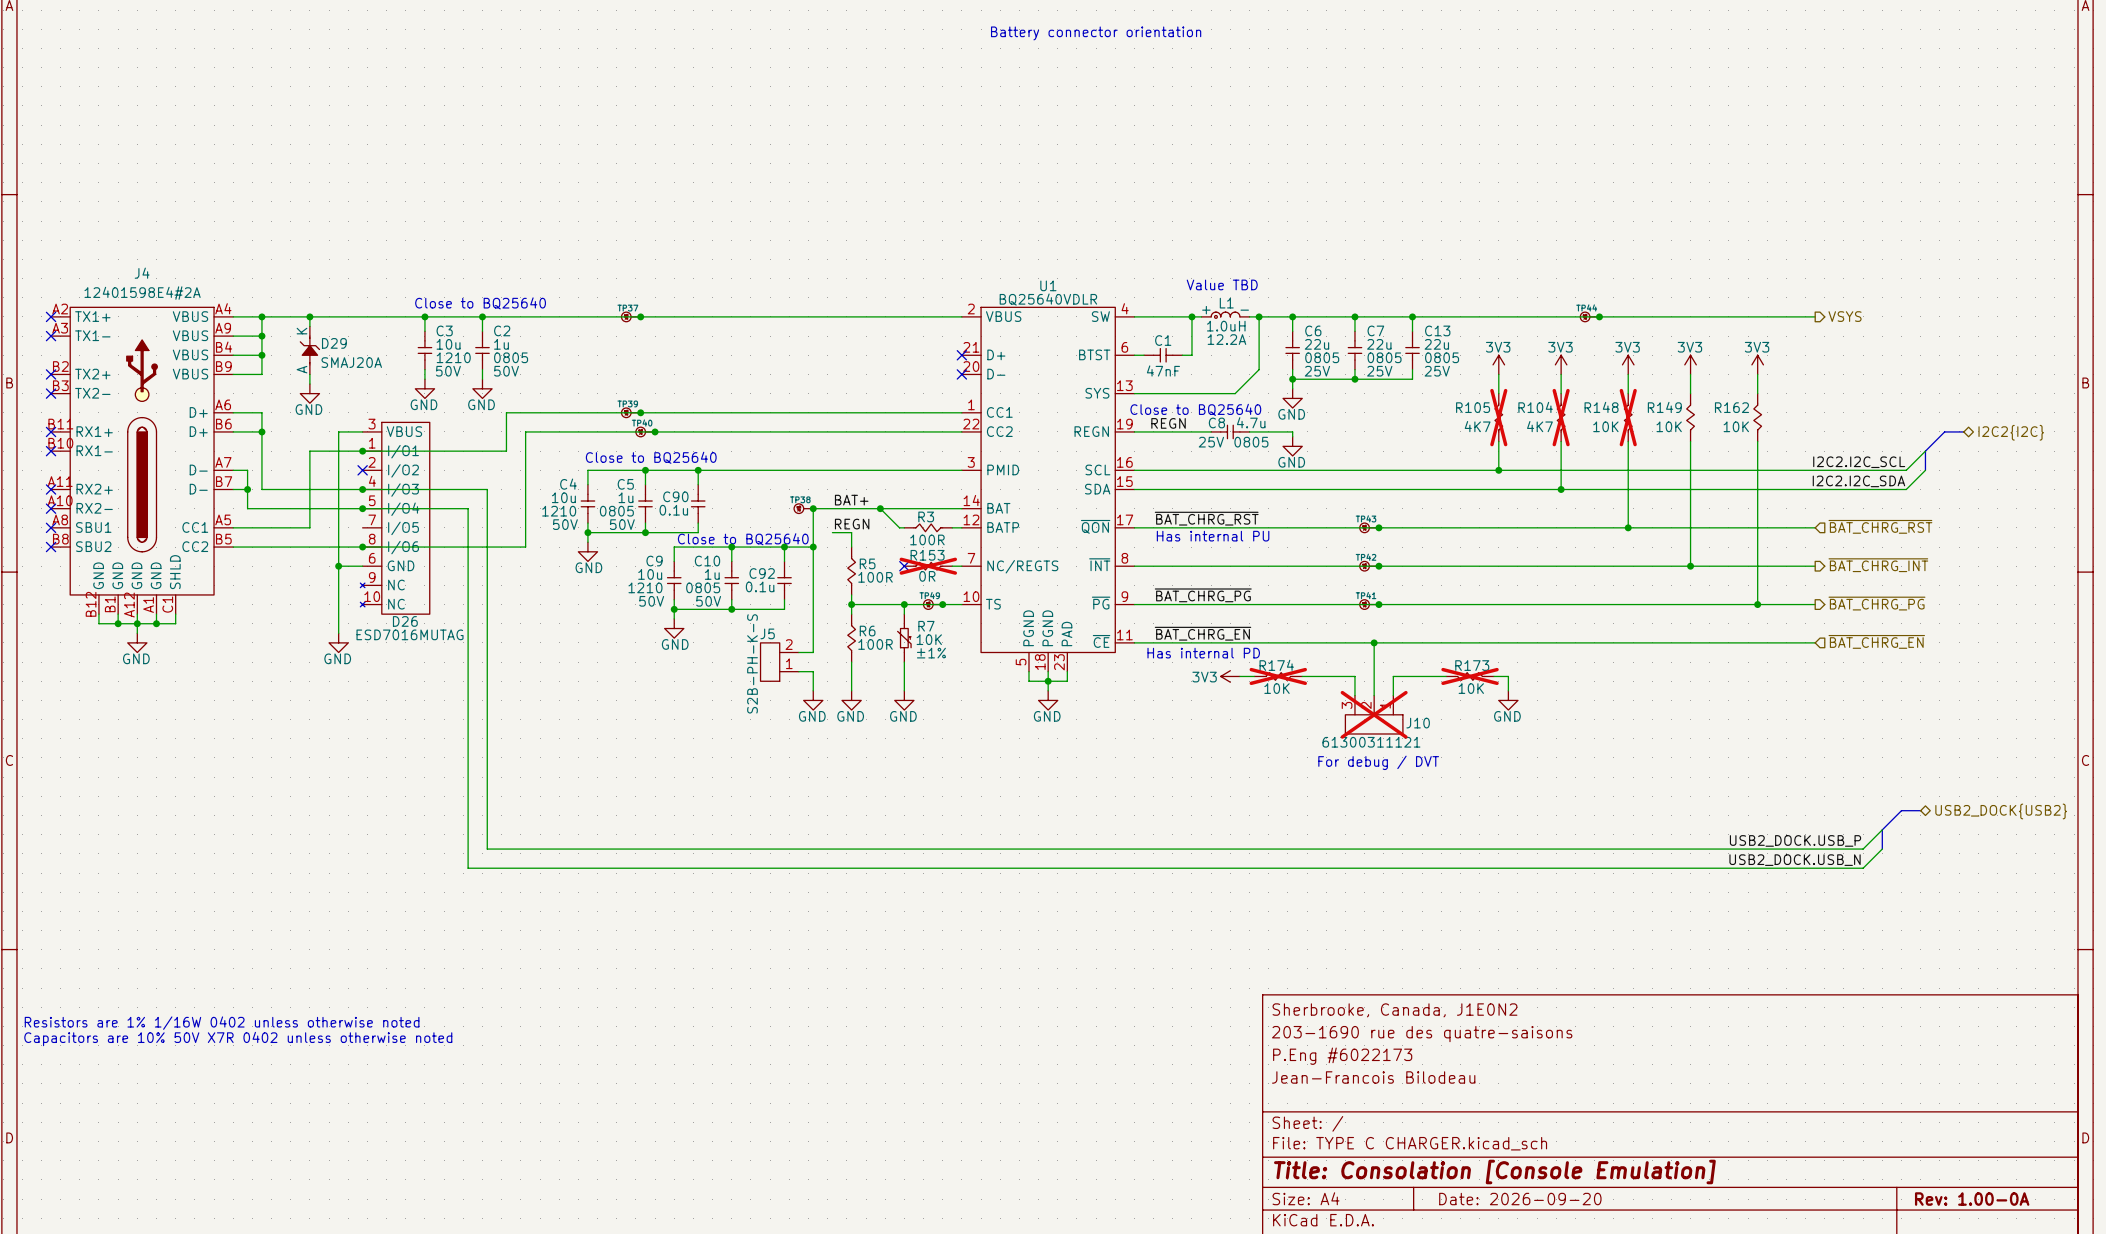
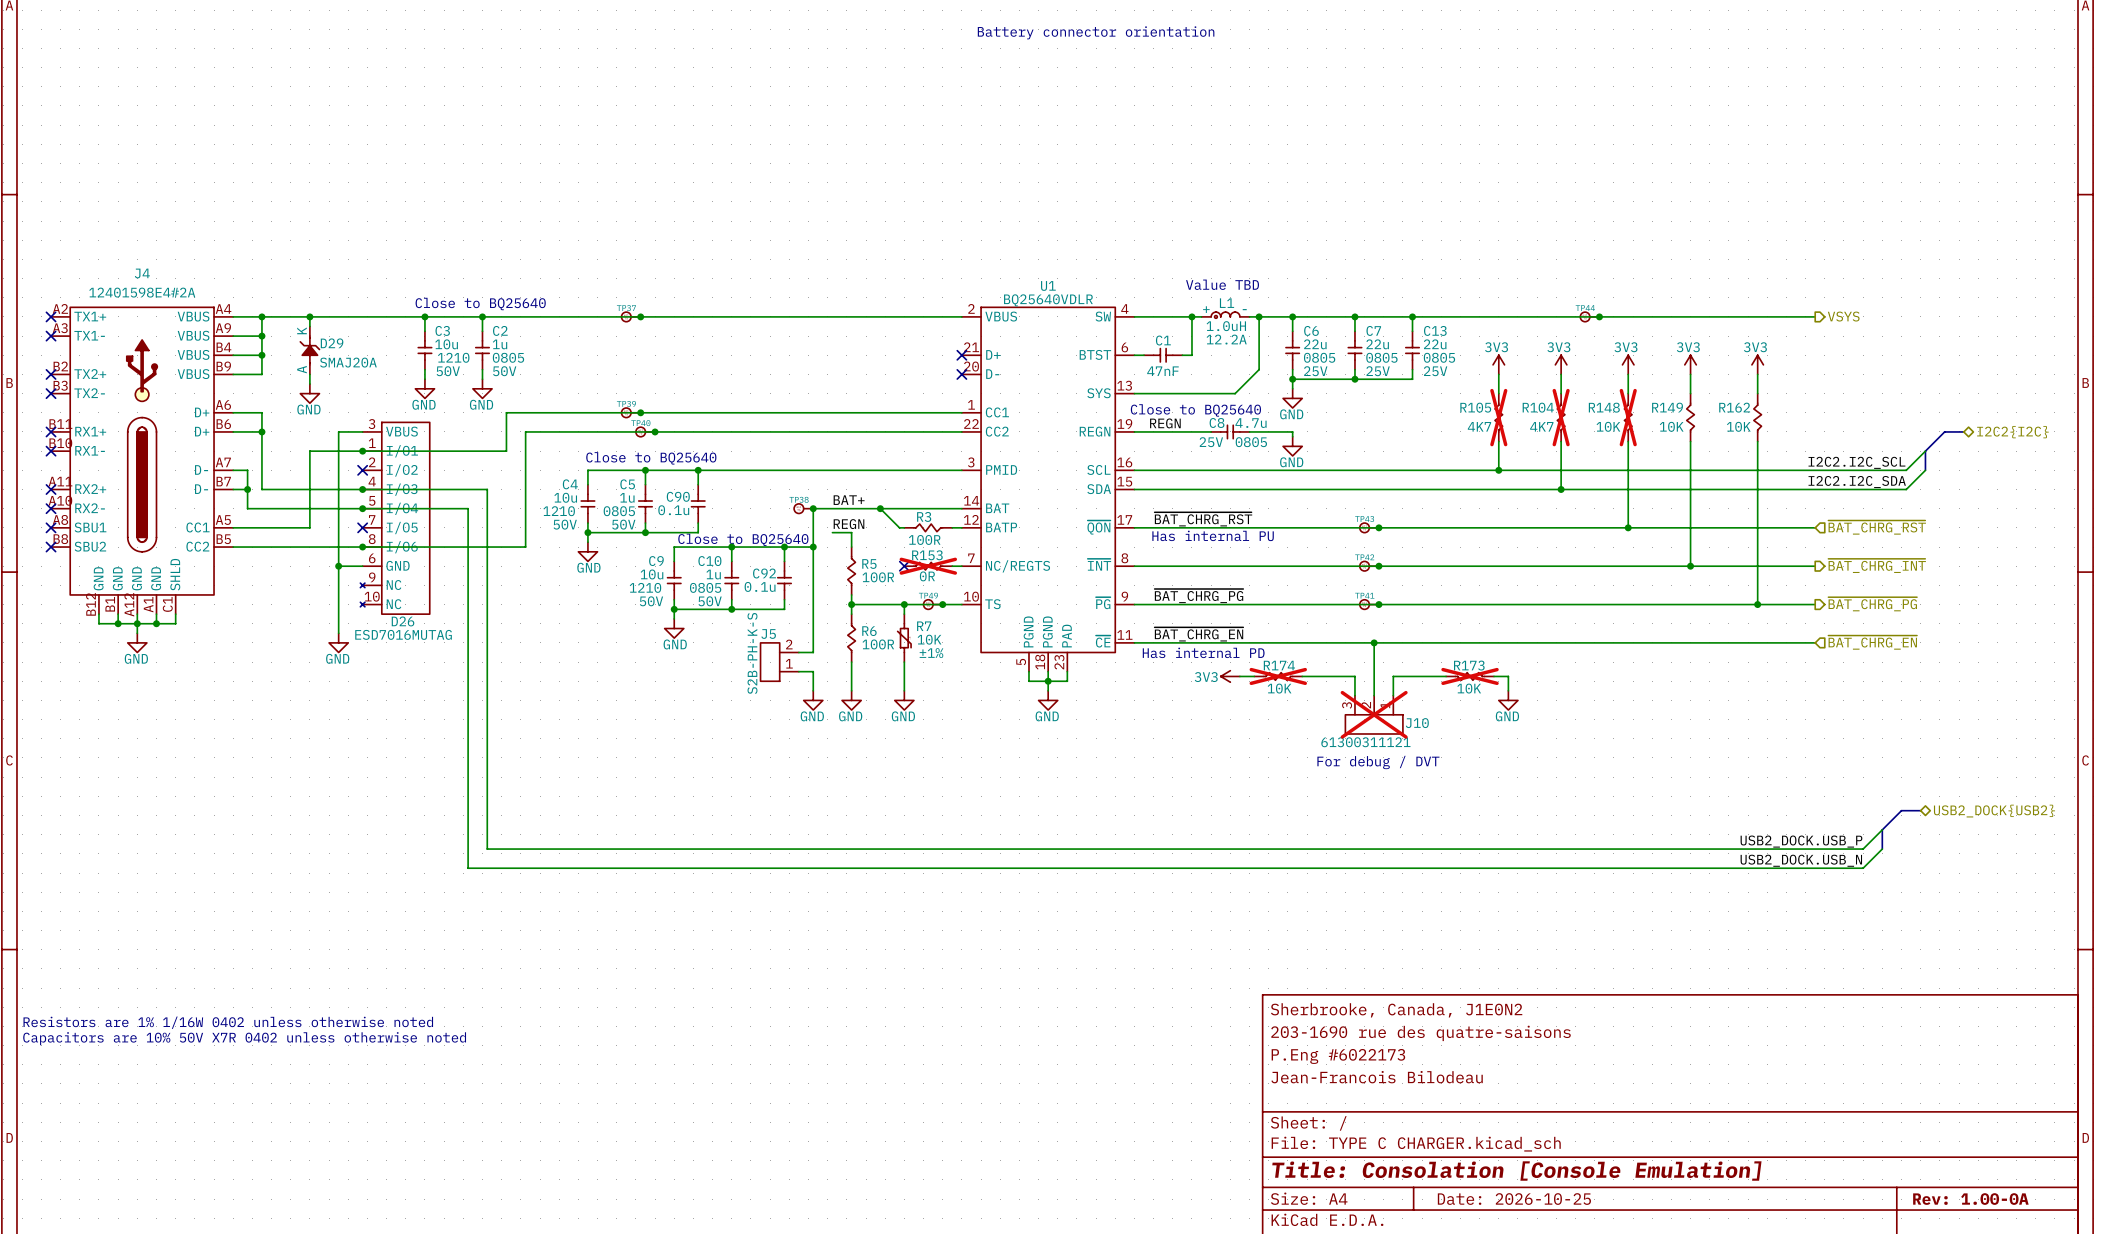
no-connect mark: none -> (362, 527)
title block: Date: 2026-09-20 (1520, 1199) -> Date: 2026-10-25 (1514, 1199)

